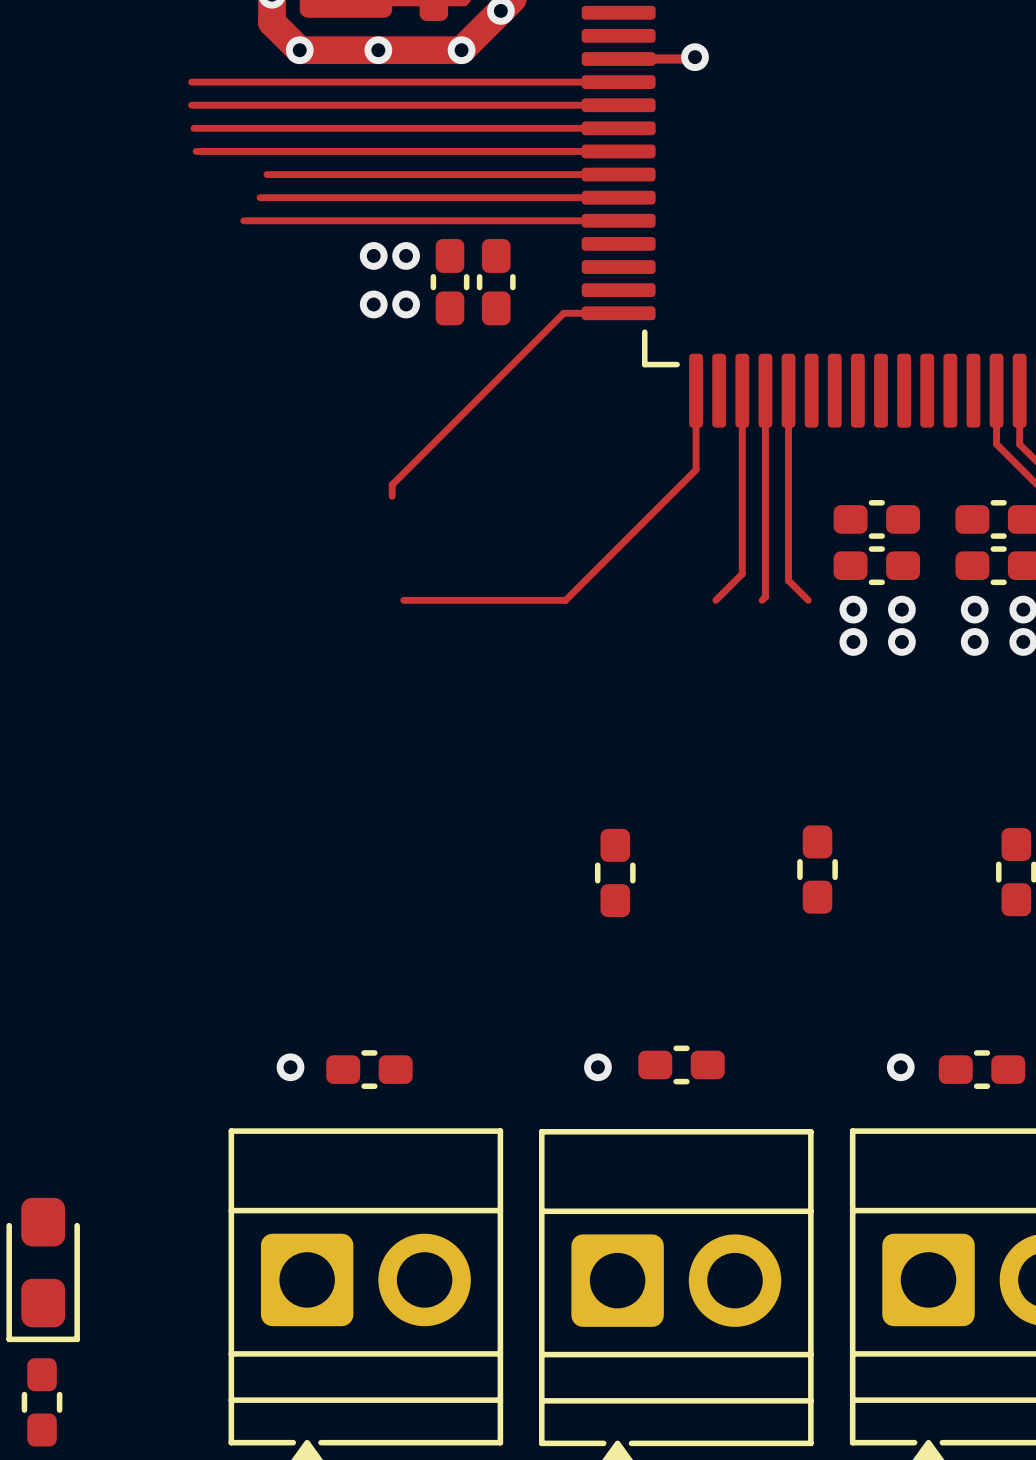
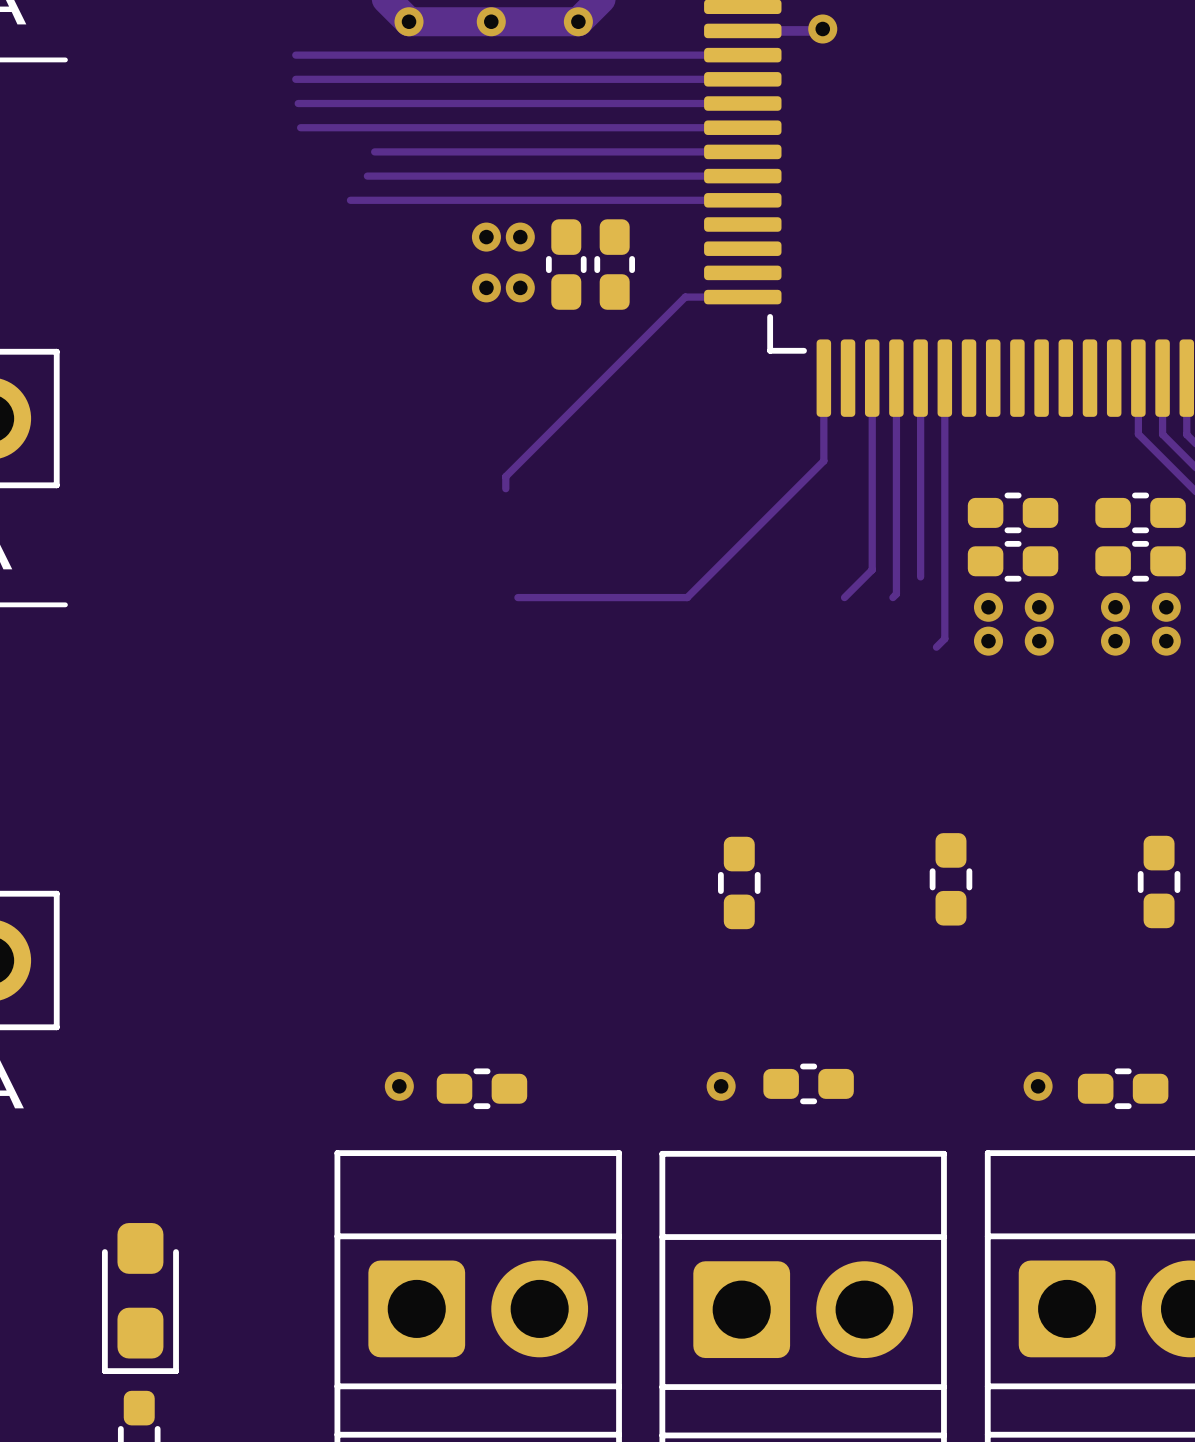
track: none -> (944, 378) (944, 638) (936, 647)
track: (788, 580) (808, 600) -> none

